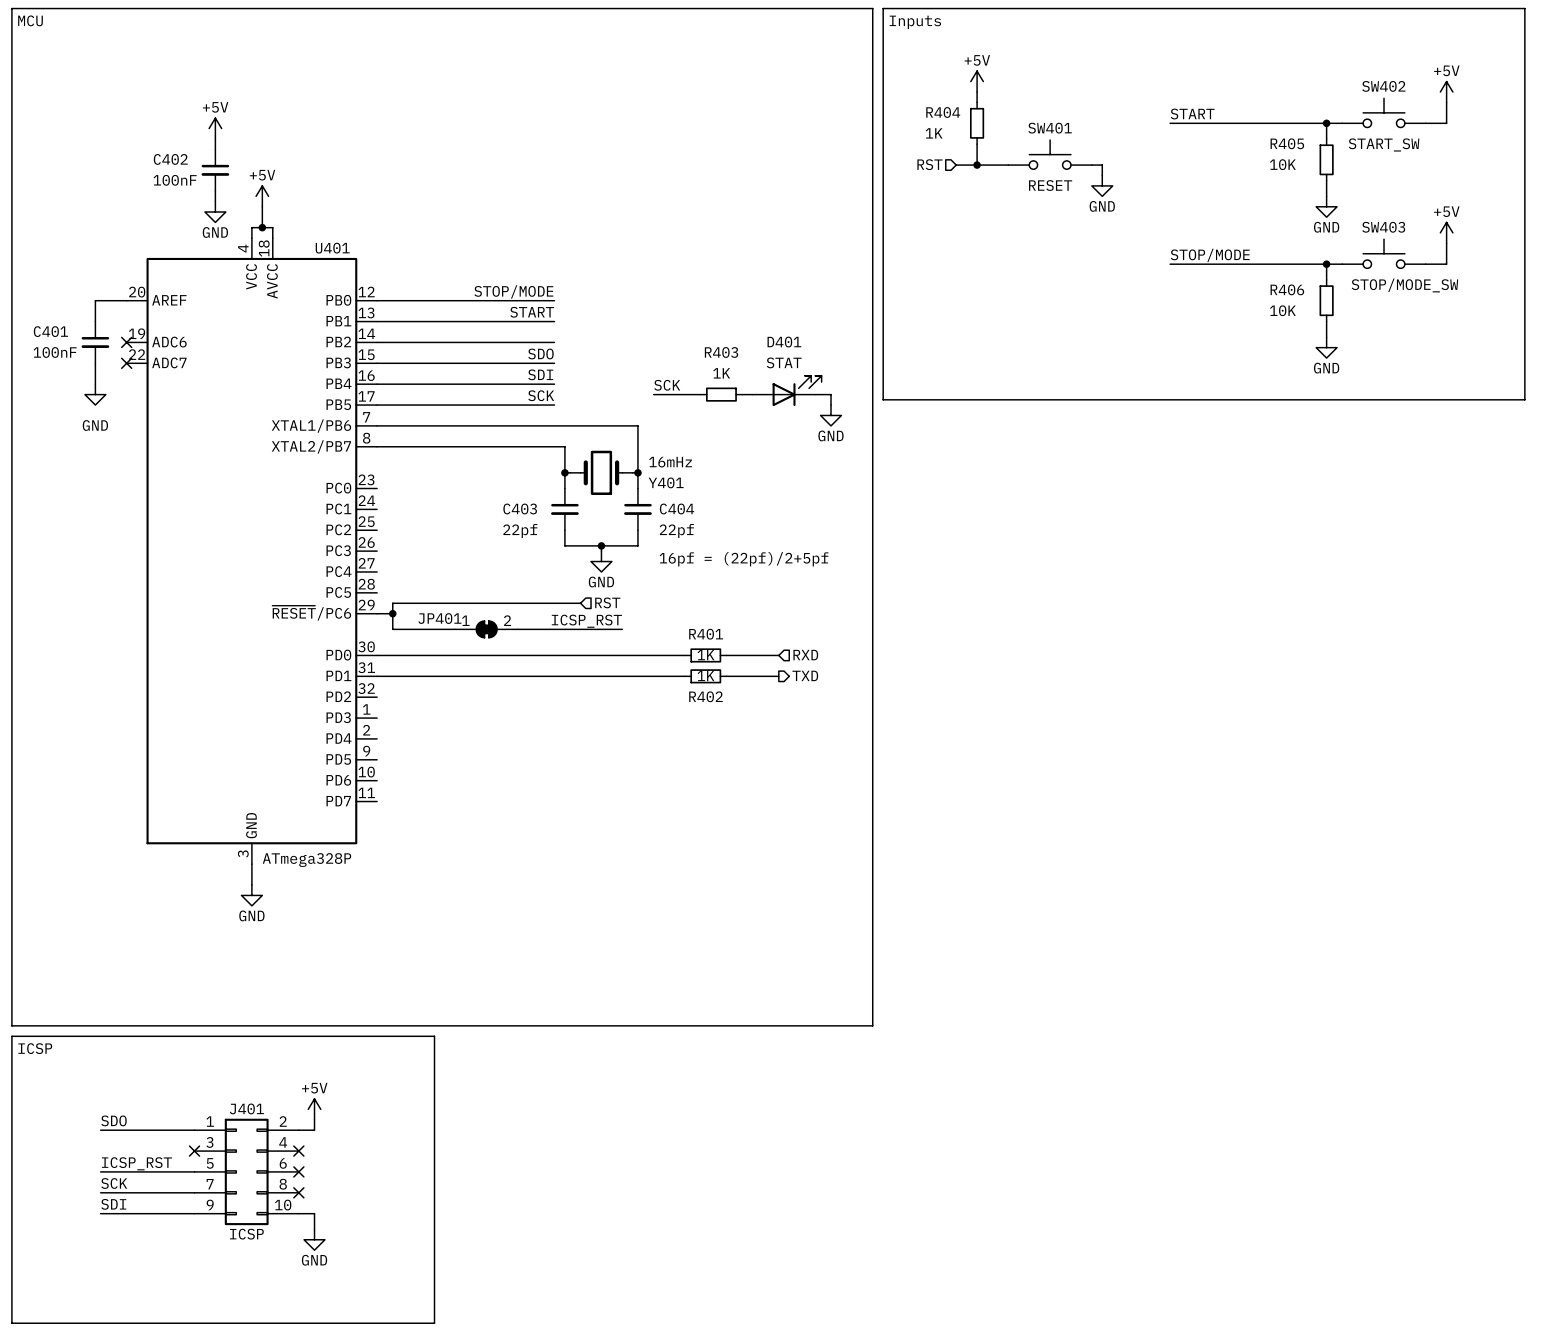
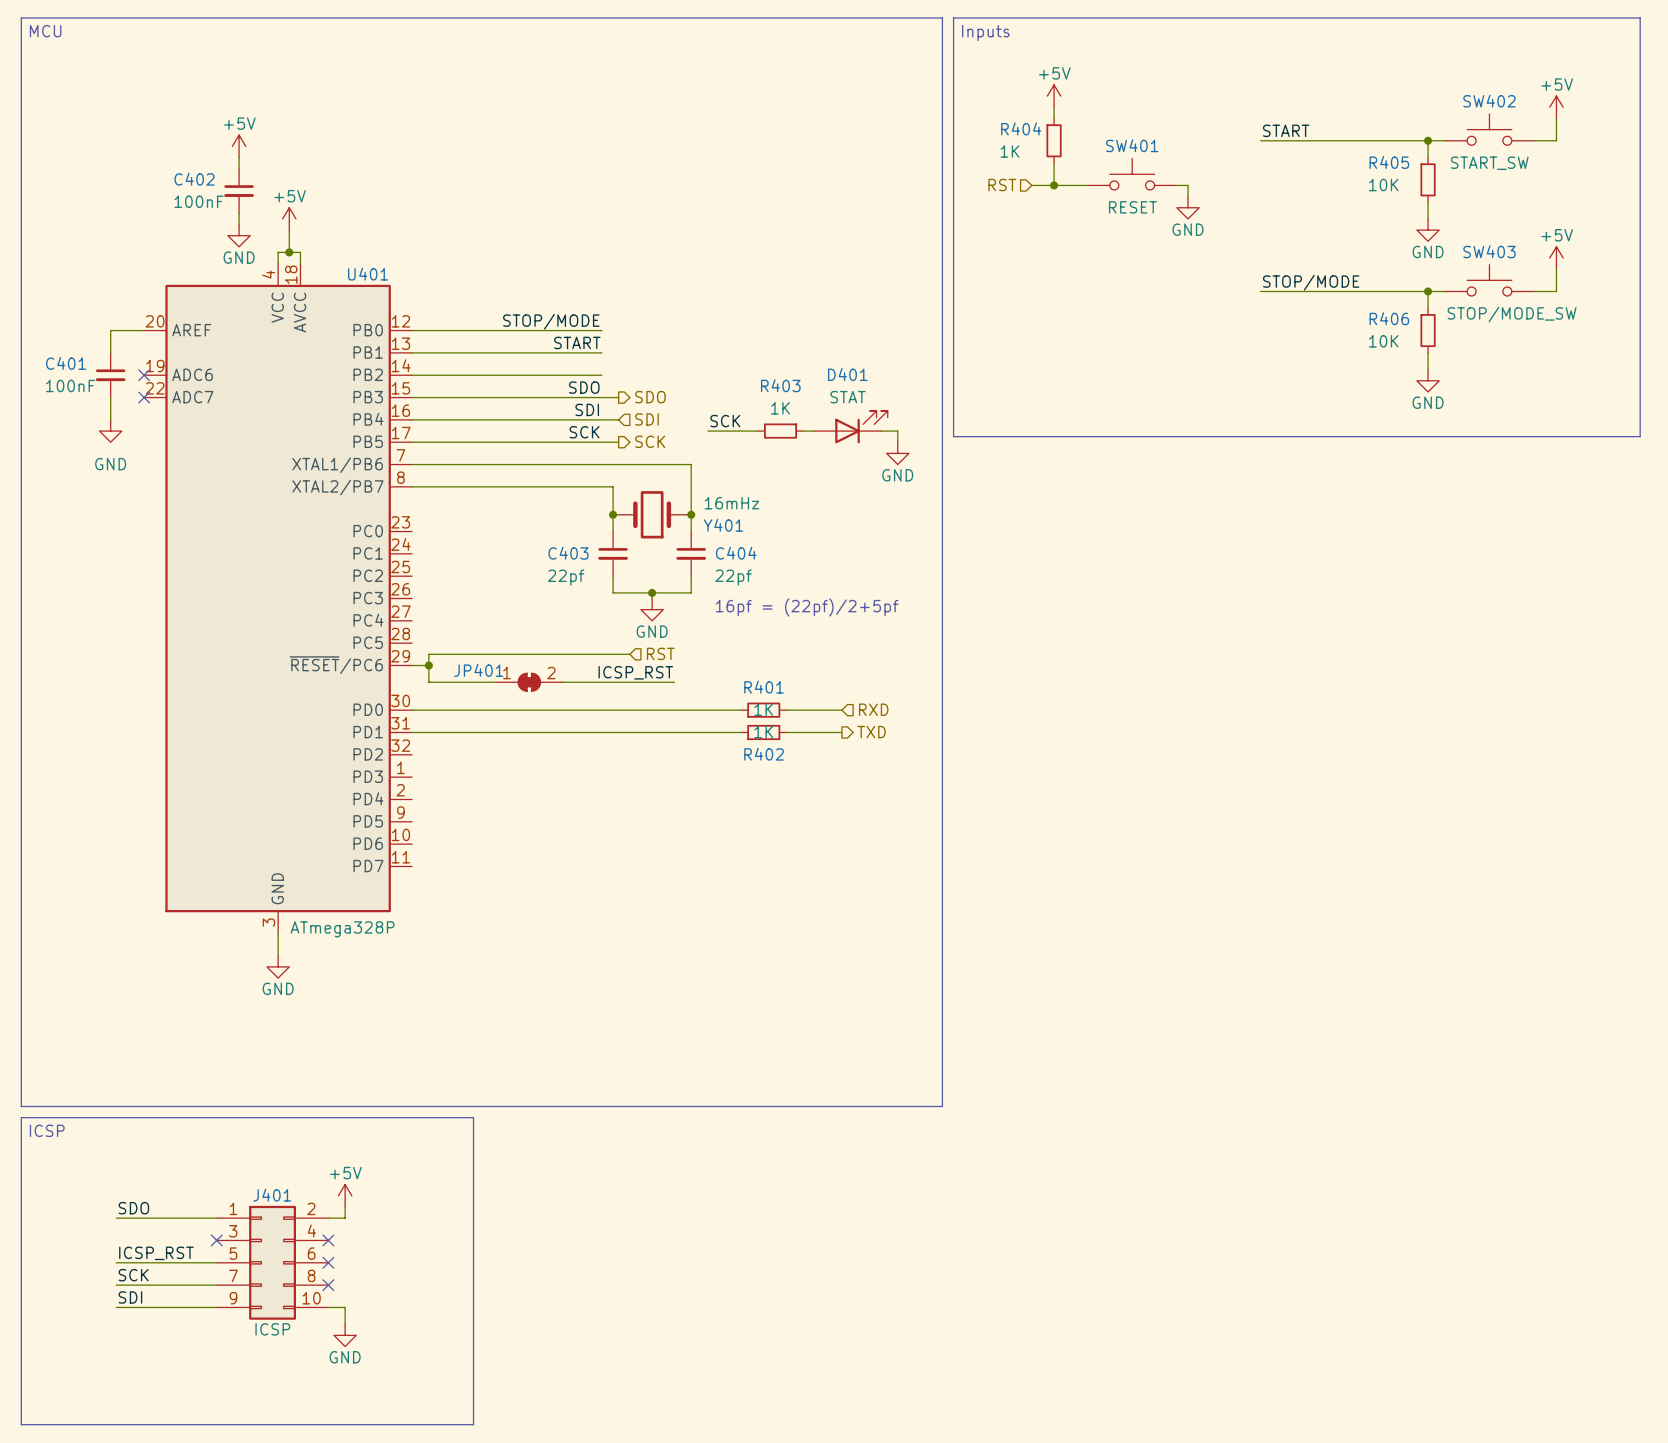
hierarchical label: none -> SDO (650, 397)
wire: none -> (601, 397) (618, 397)
hierarchical label: none -> SDI (647, 419)
wire: none -> (601, 419) (618, 419)
hierarchical label: none -> SCK (650, 441)
wire: none -> (601, 442) (618, 442)

